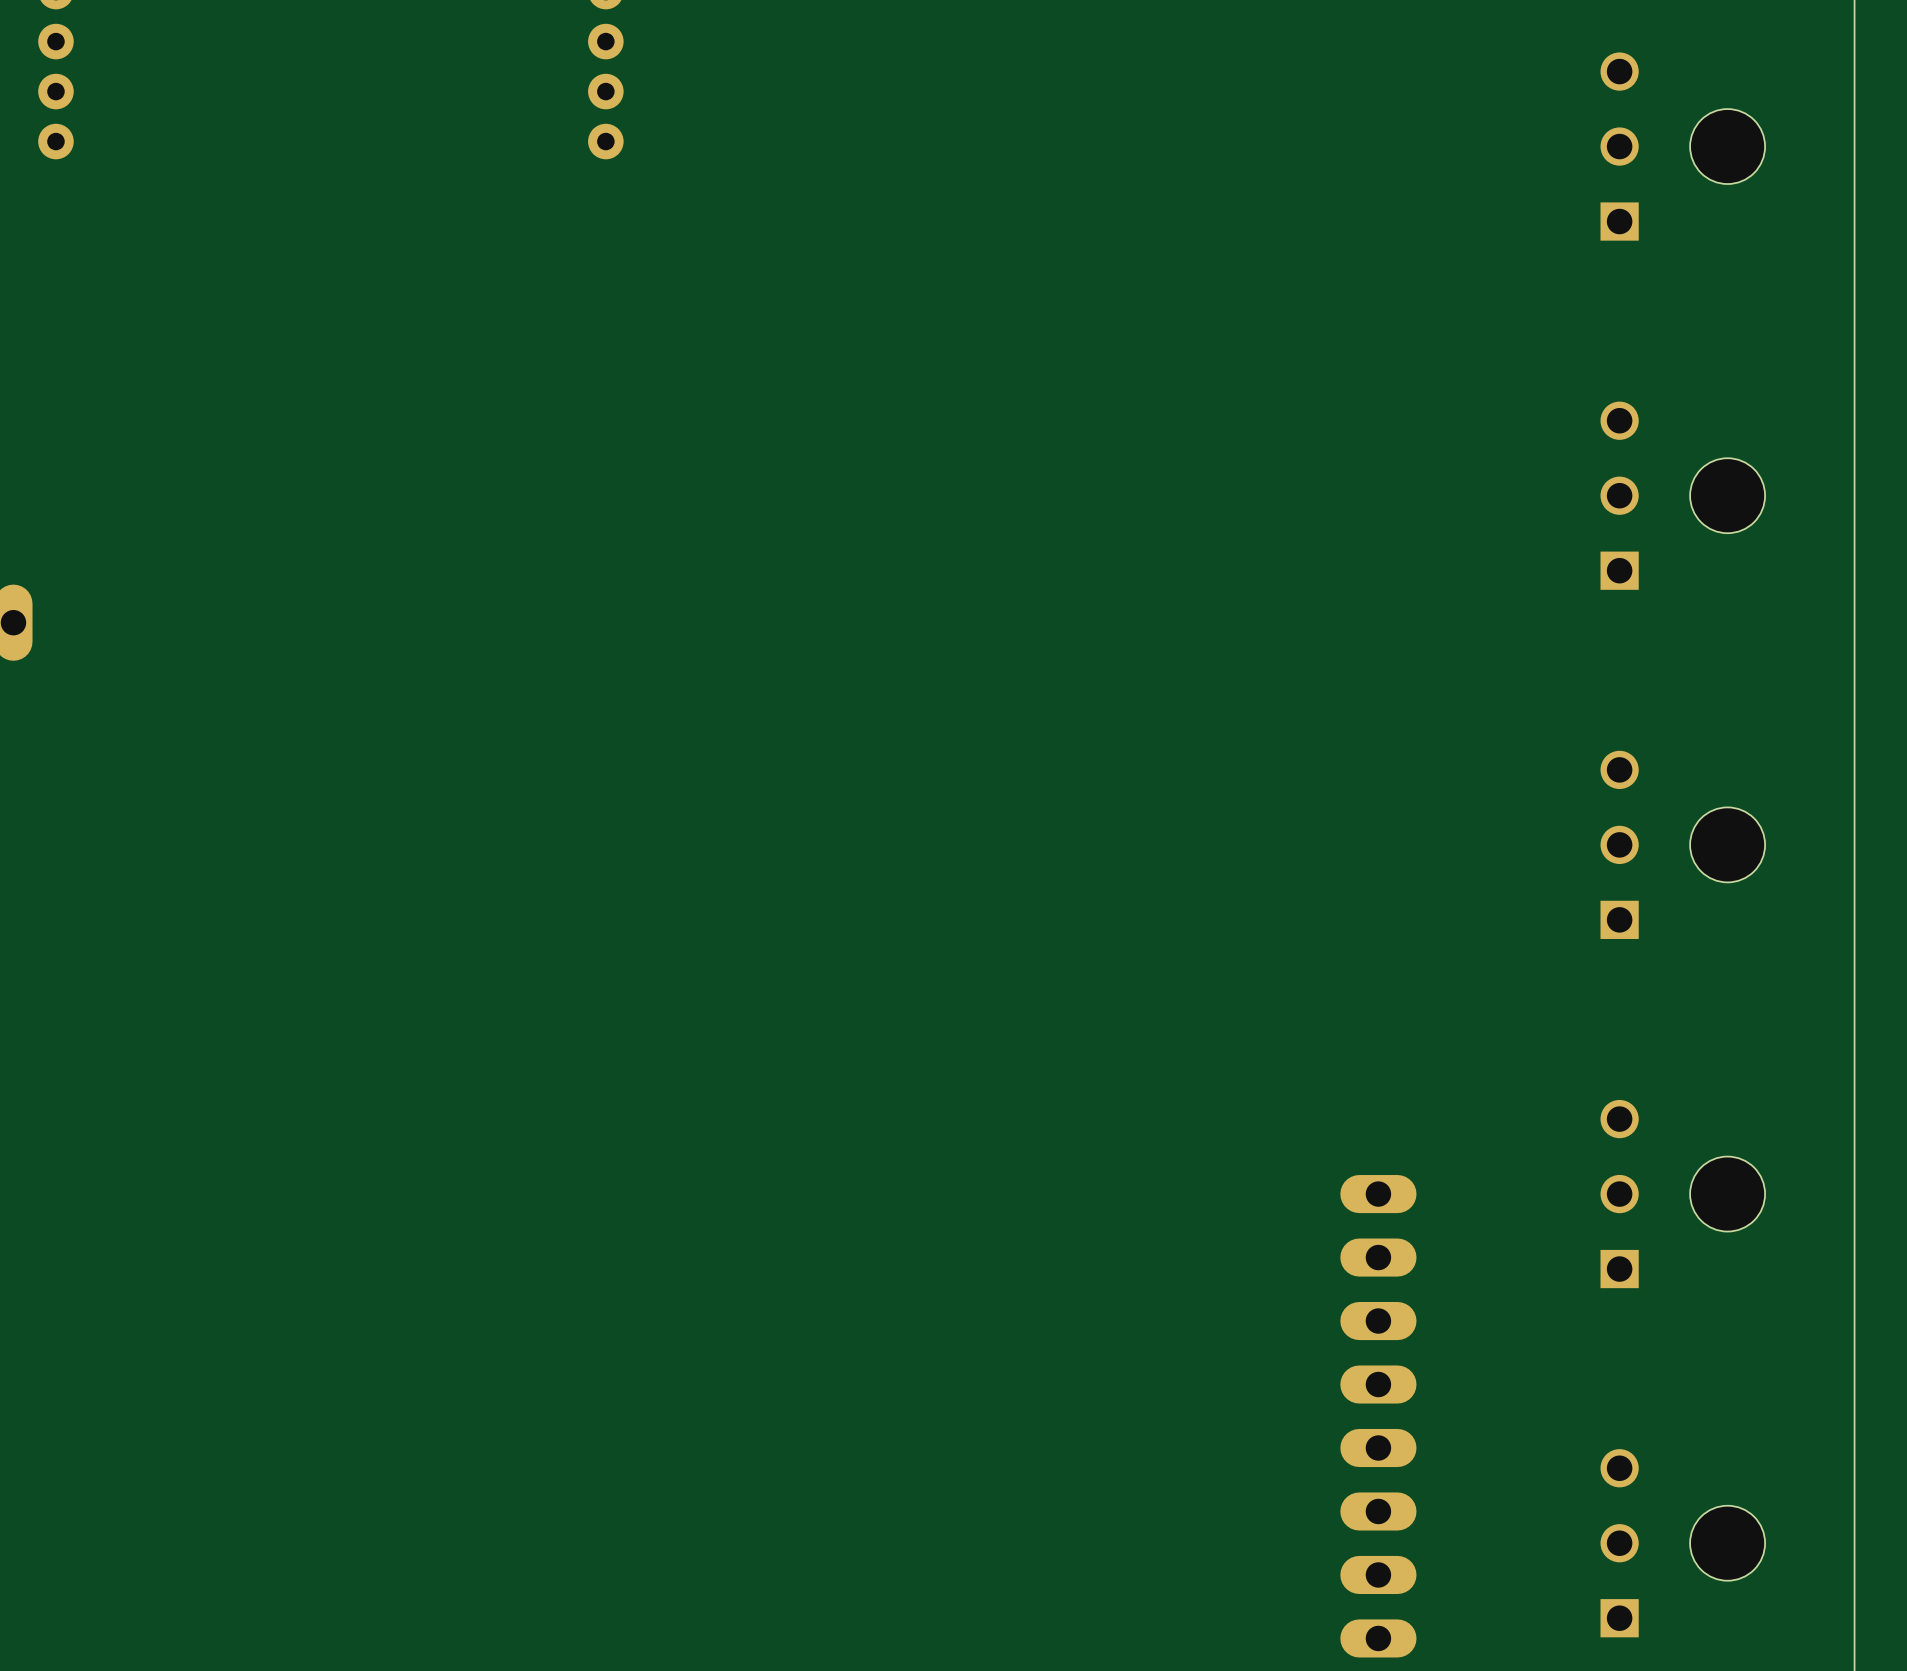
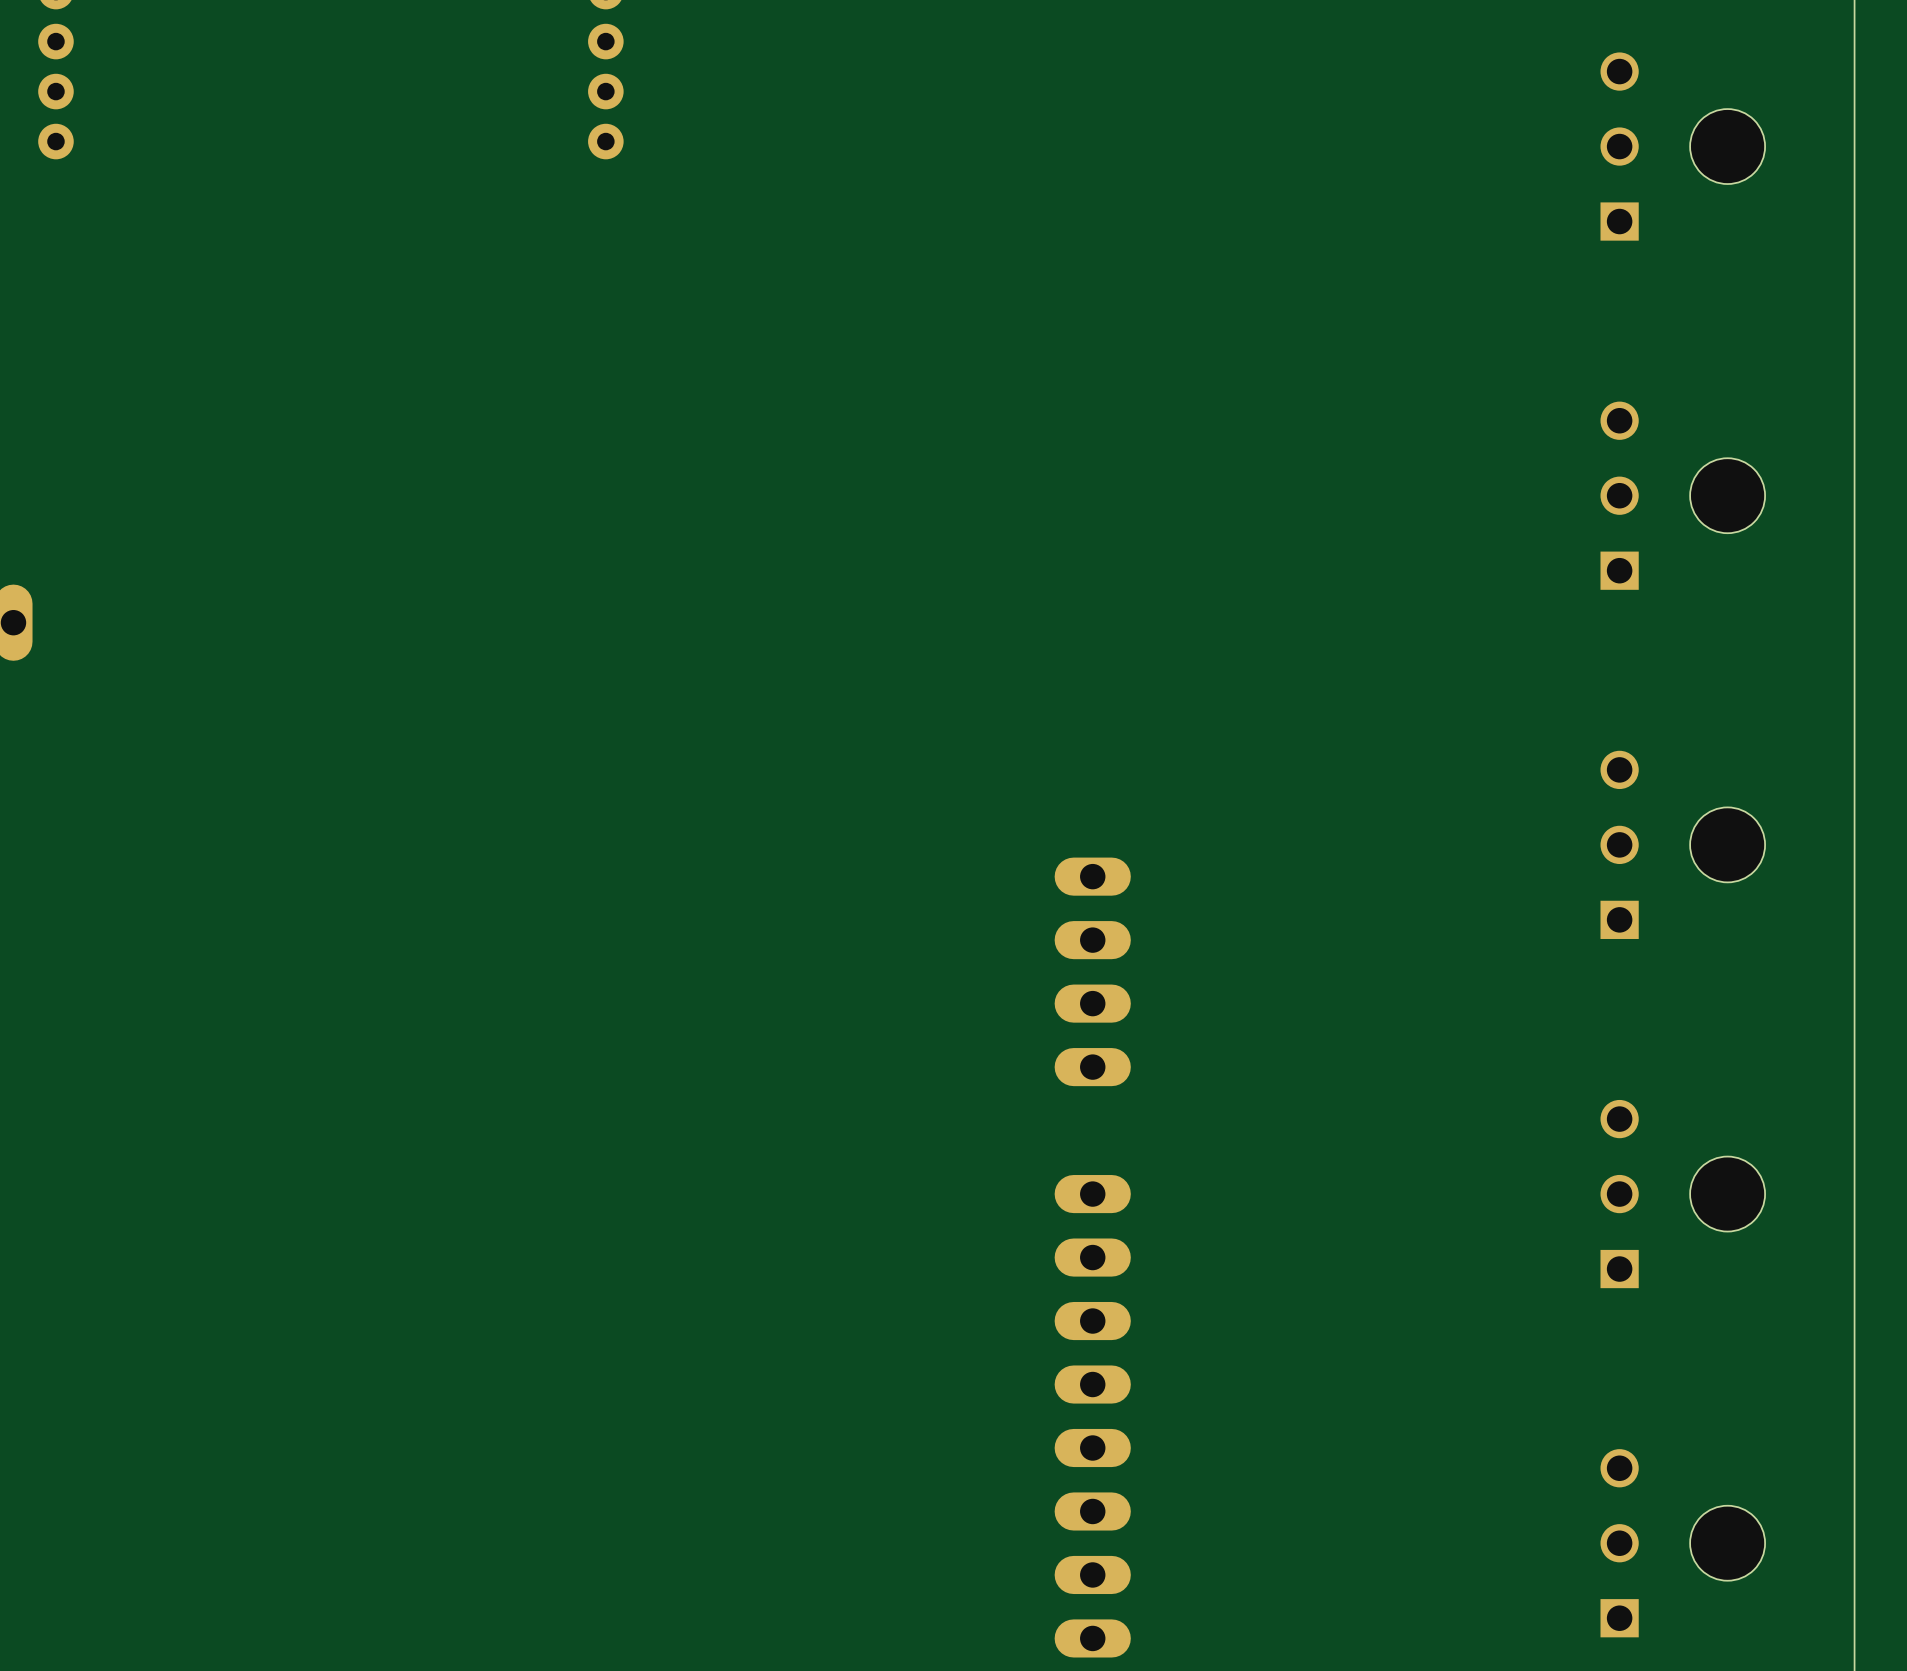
part: none -> (1092, 971)
part position: (1378, 1416) -> (1092, 1416)

